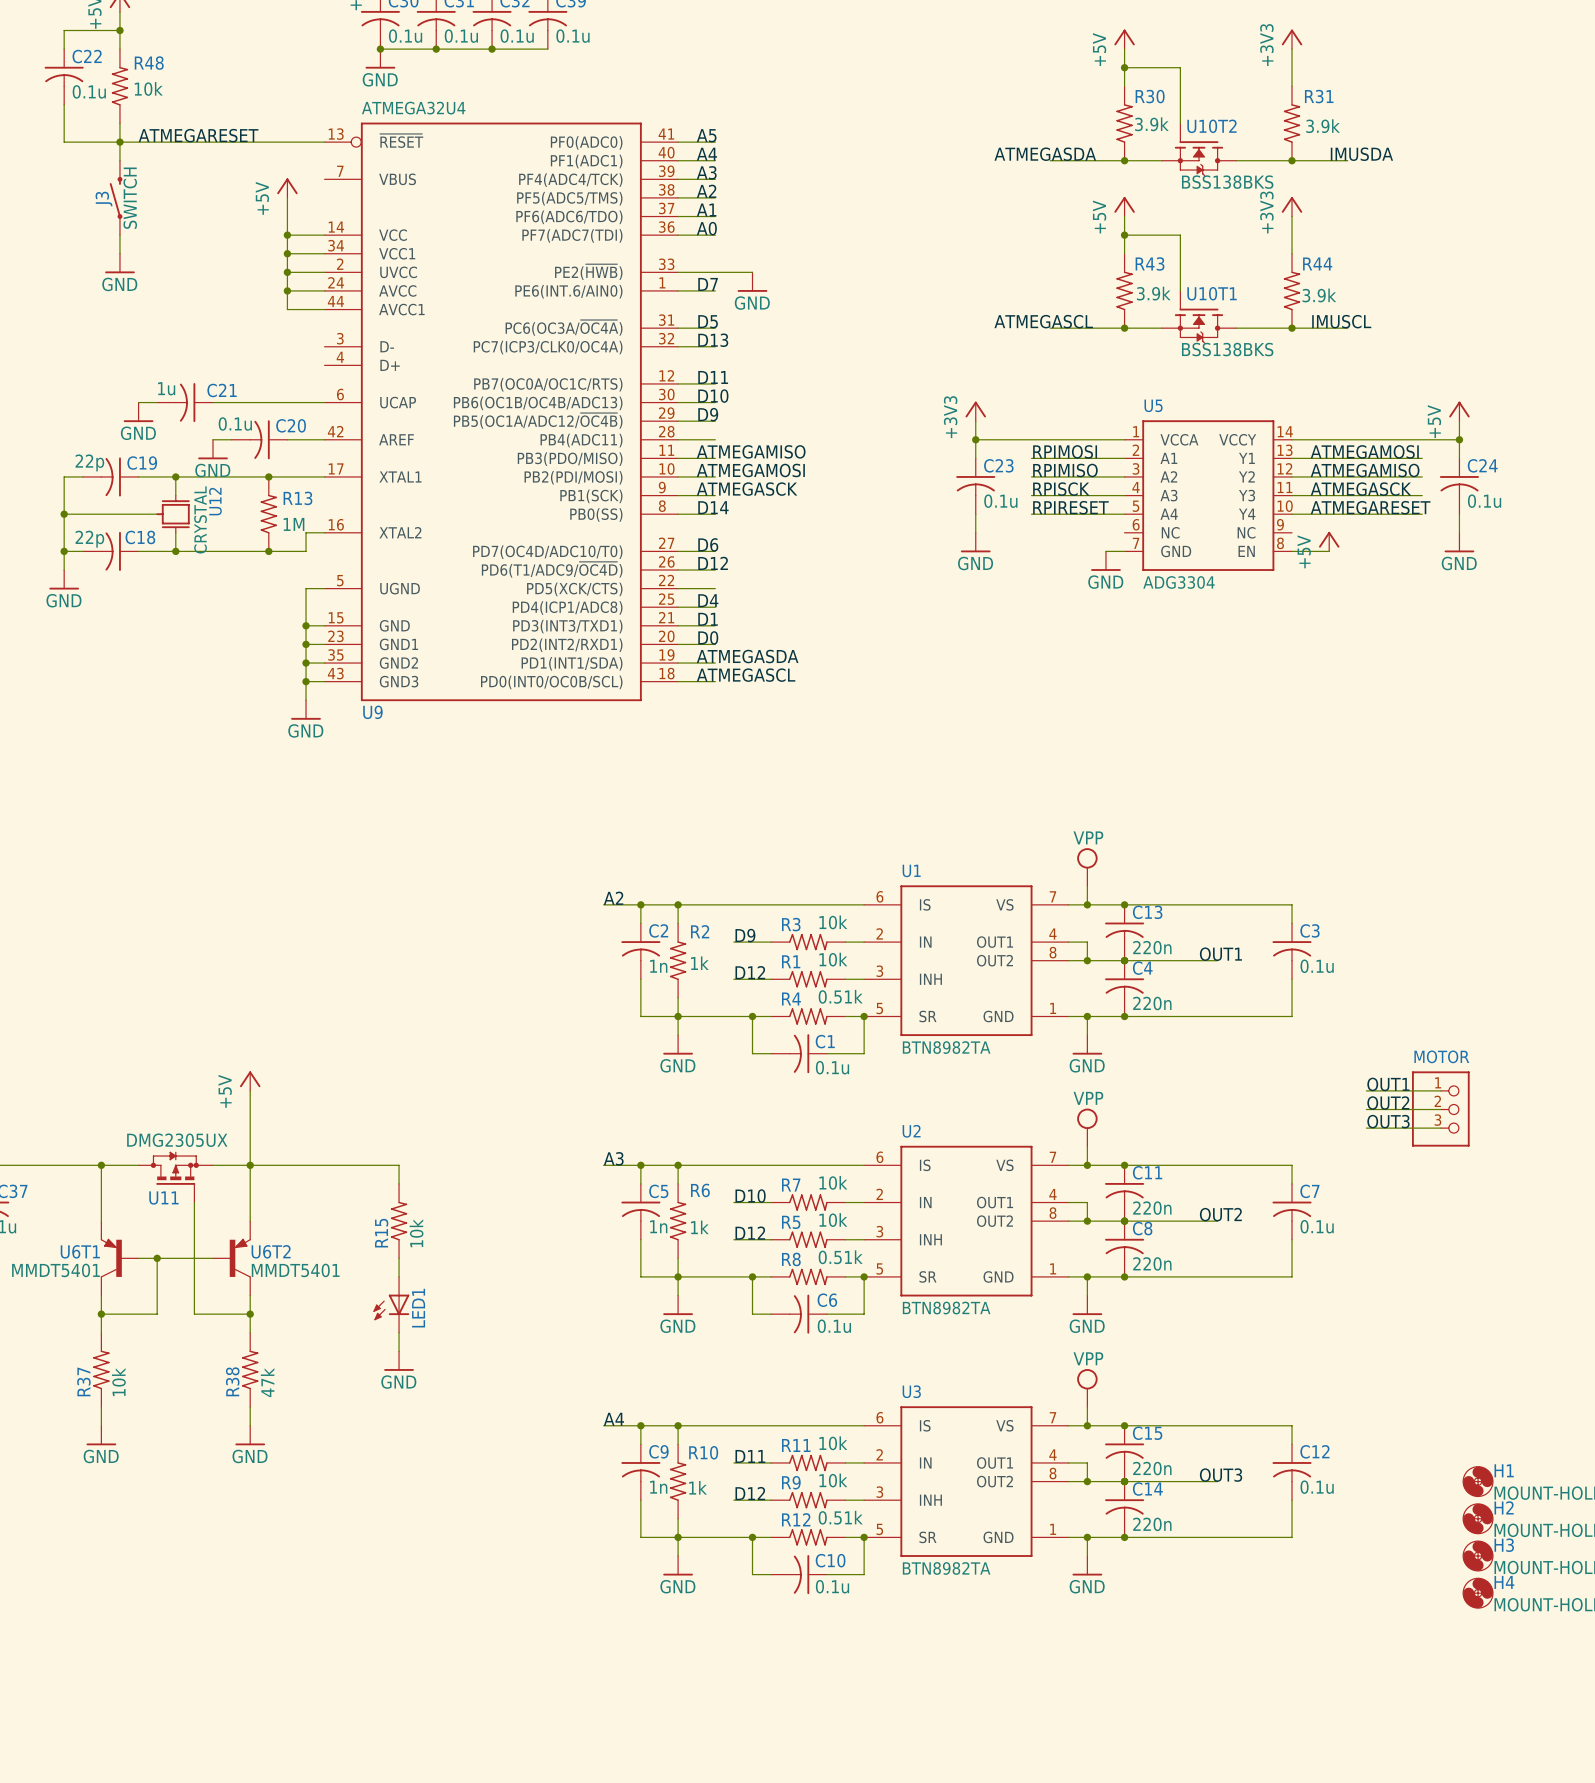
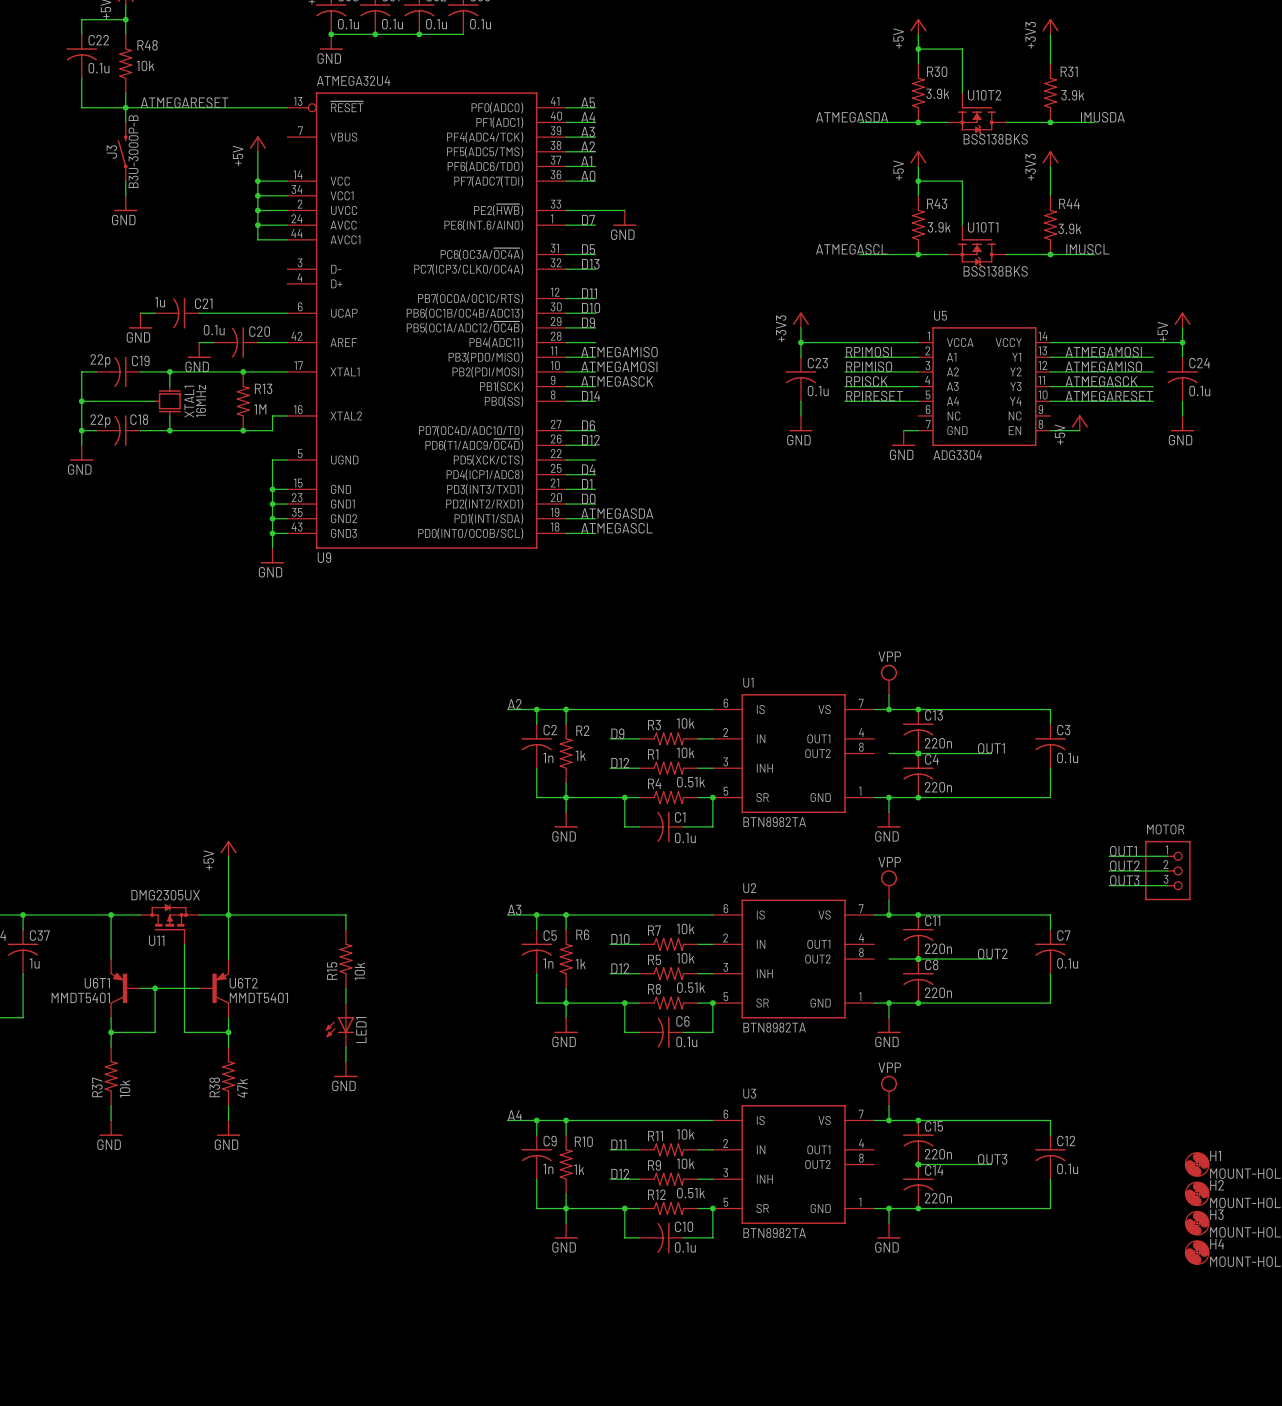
J3 value: SWITCH (130, 198) -> B3U-3000P-B (133, 151)
U12 name: U12 (215, 501) -> XTAL1 (189, 401)
U12 value: CRYSTAL (200, 519) -> 16MHz (201, 401)
wire: (1068, 942) (1087, 942) (1087, 960) (1068, 960) -> none
junction: (1087, 960) -> none
wire: (1068, 1202) (1087, 1202) (1087, 1221) (1068, 1221) -> none
junction: (1087, 1221) -> none
wire: (1068, 1462) (1087, 1462) (1087, 1481) -> none
wire: (1068, 1481) (1124, 1481) -> none
junction: (1087, 1481) -> none

